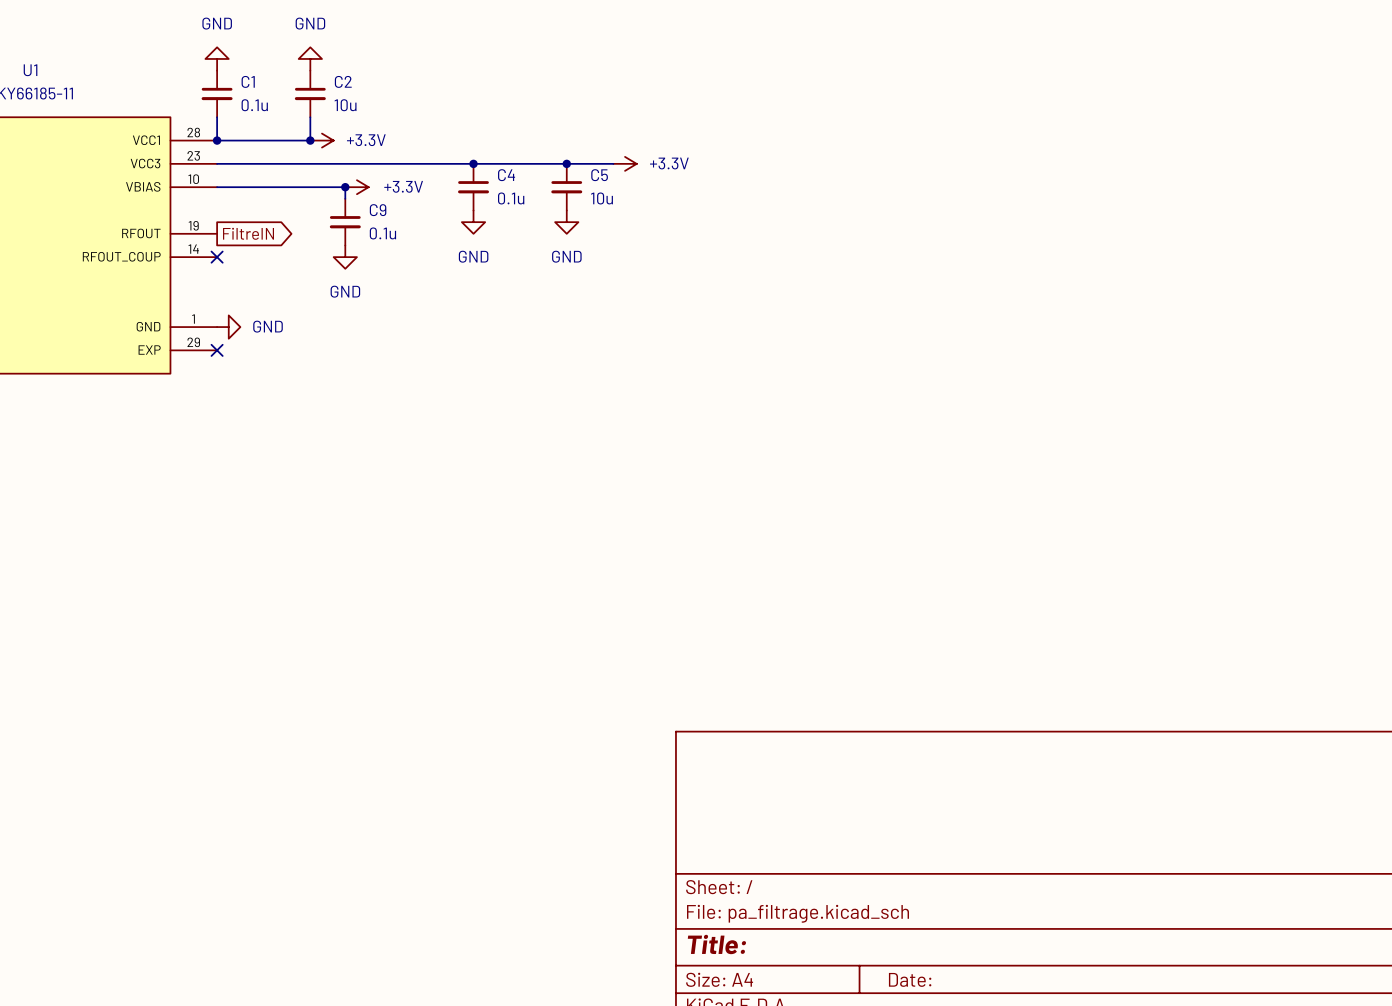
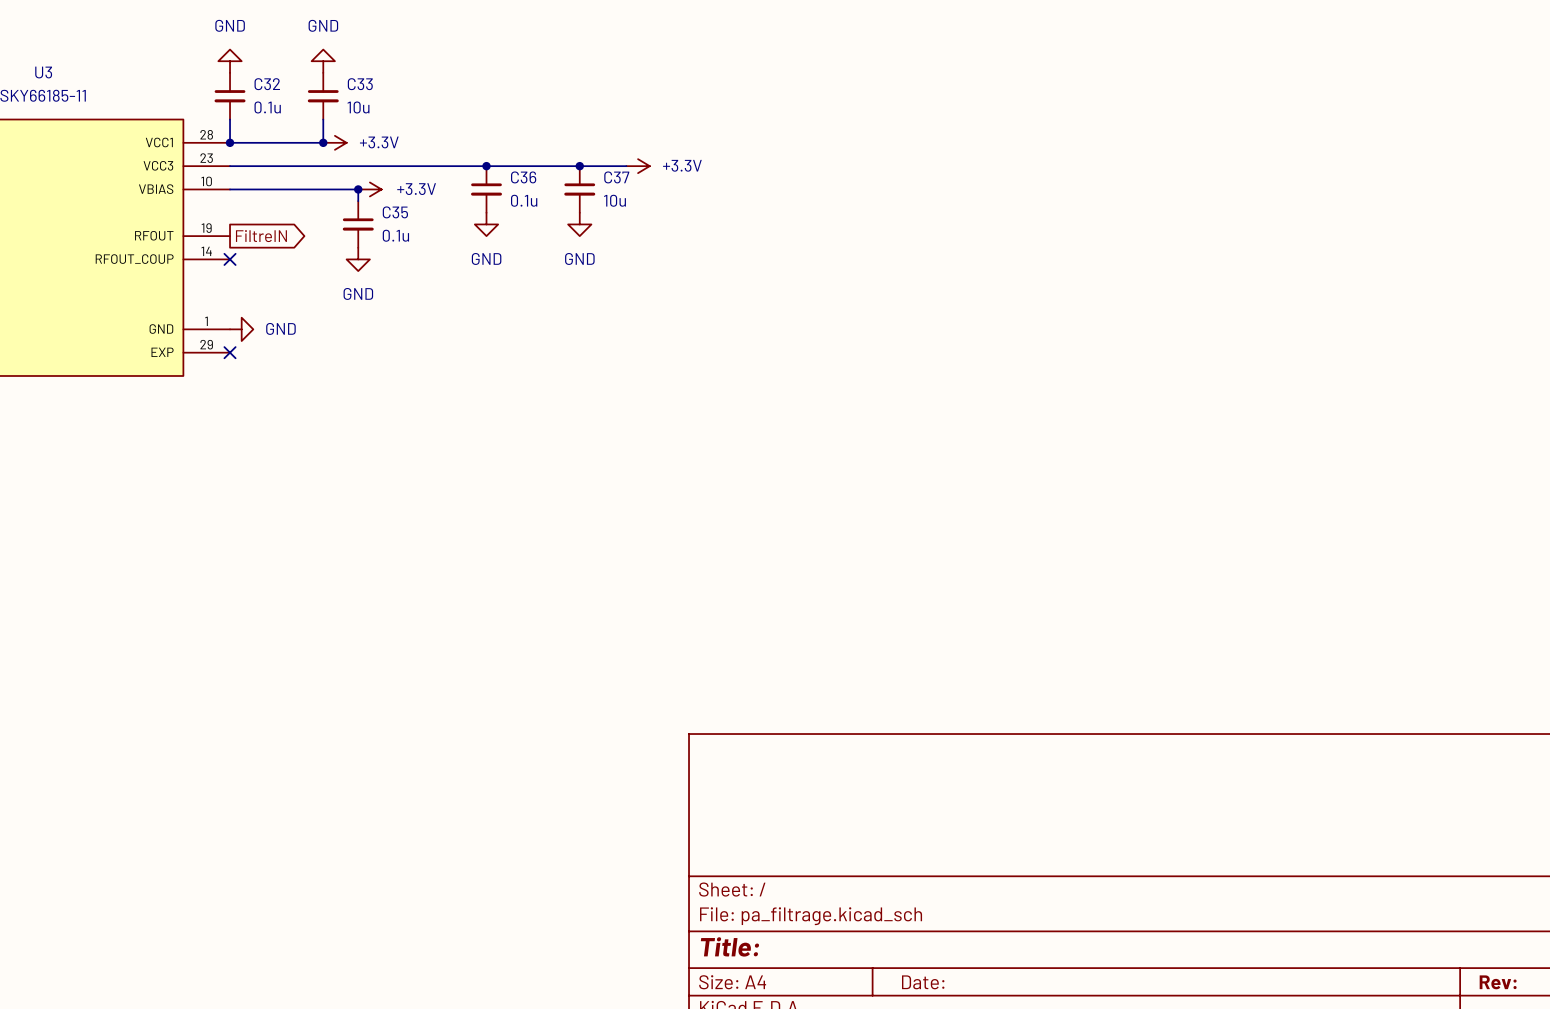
U1 name: U1 (30, 70) -> U3 (43, 72)
C1 name: C1 (248, 81) -> C32 (267, 84)
C2 name: C2 (343, 81) -> C33 (360, 84)
C4 name: C4 (506, 175) -> C36 (523, 177)
C5 name: C5 (599, 175) -> C37 (616, 177)
C9 name: C9 (378, 210) -> C35 (395, 212)

